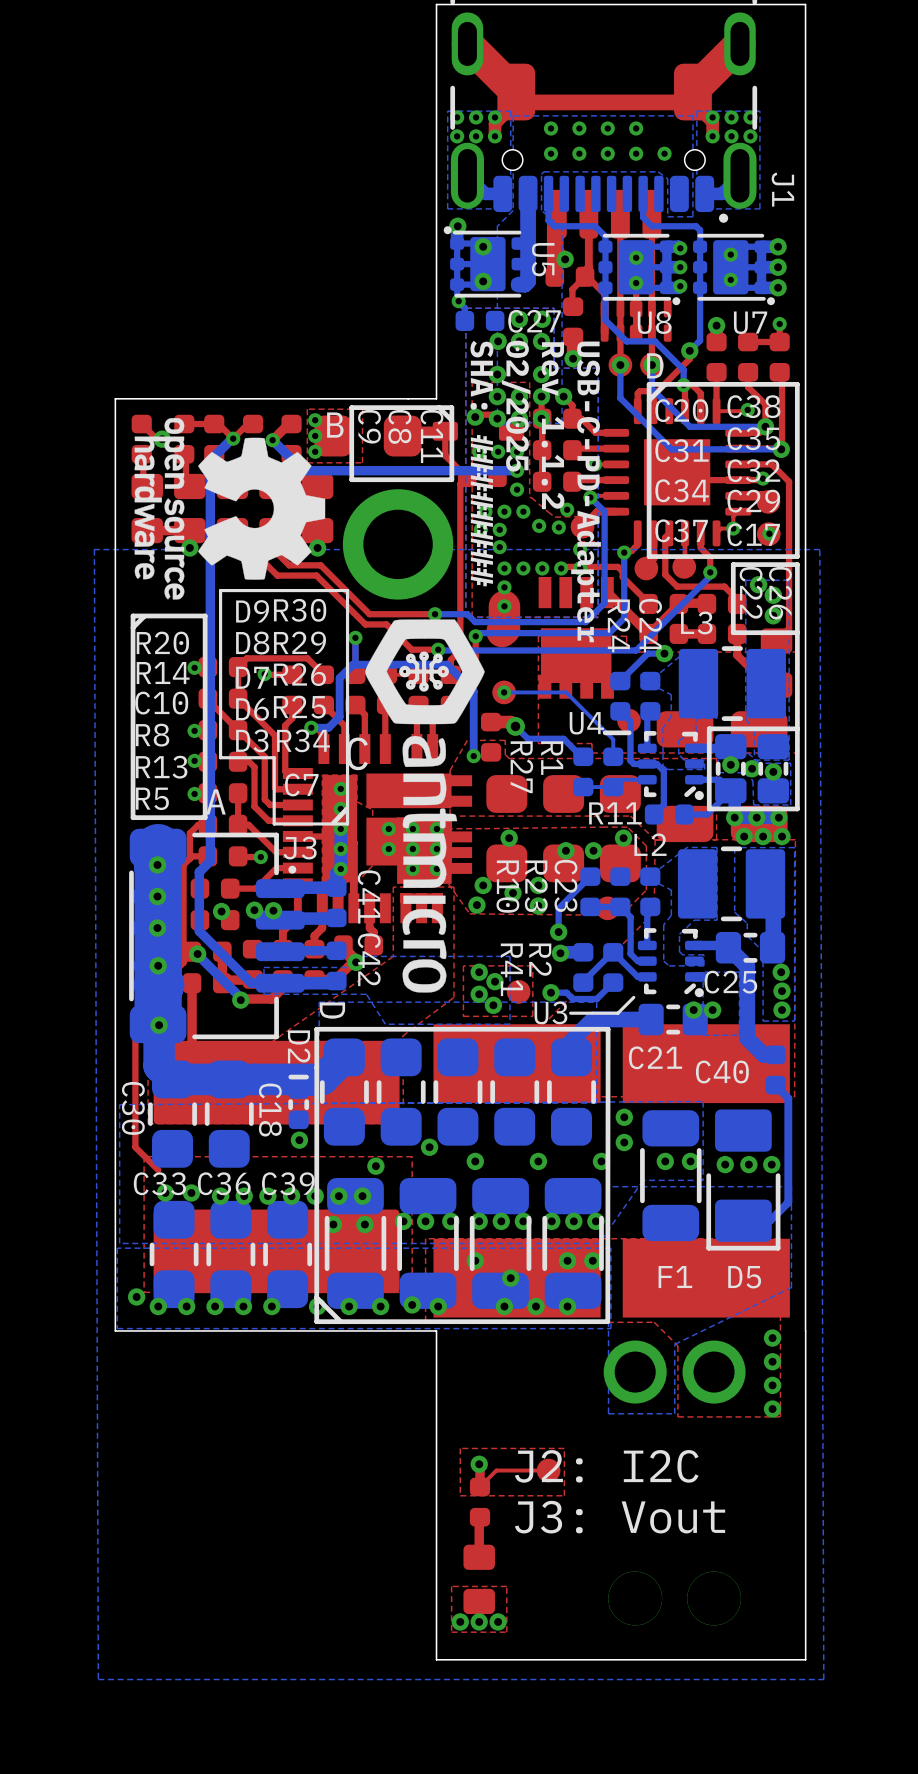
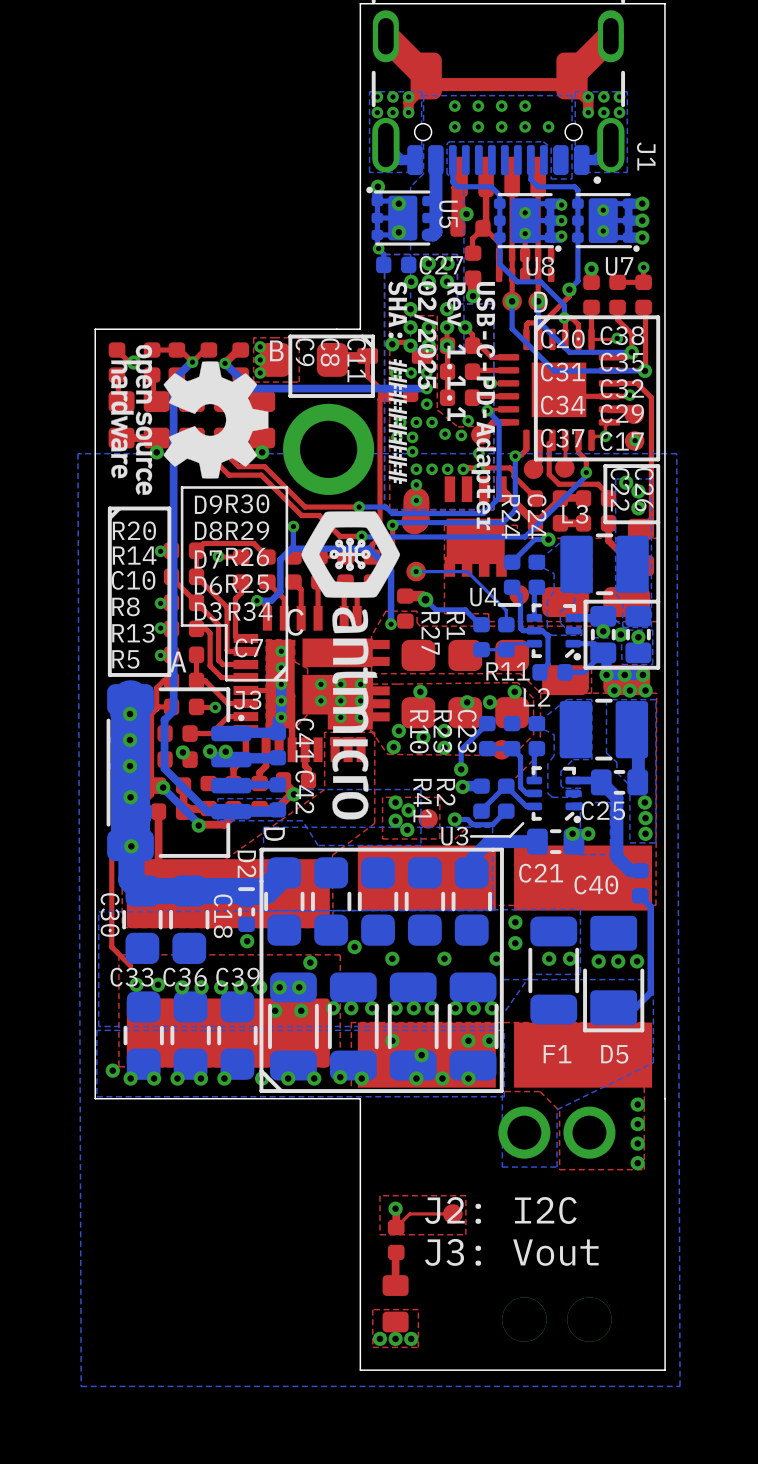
text: Rev 1.1.2 (553, 425) -> Rev 1.1.1 (456, 351)

